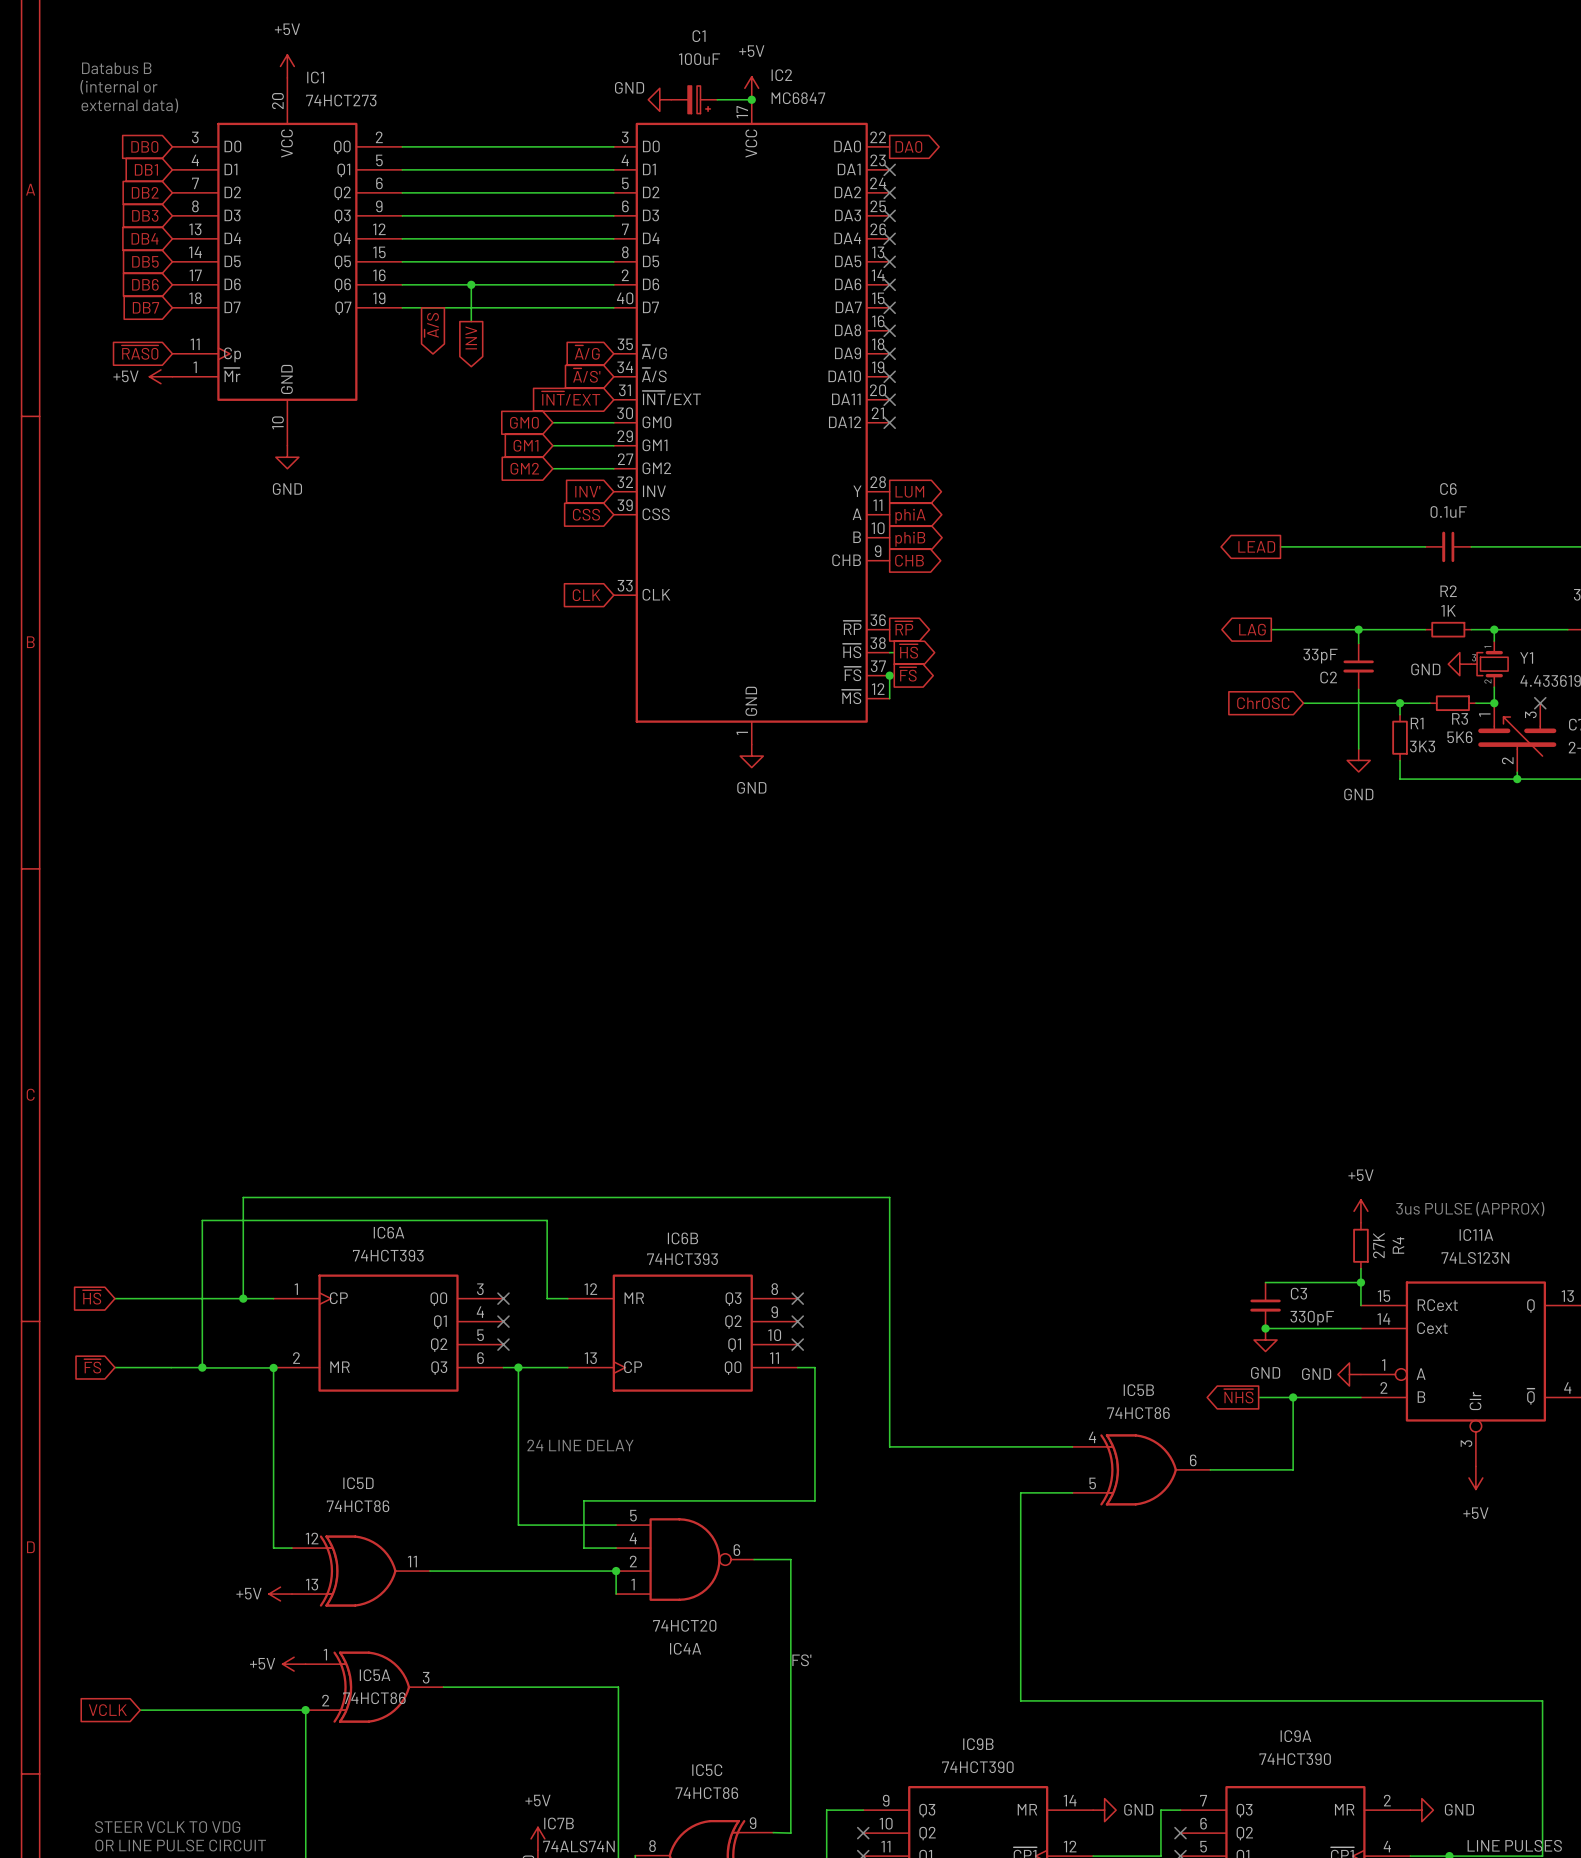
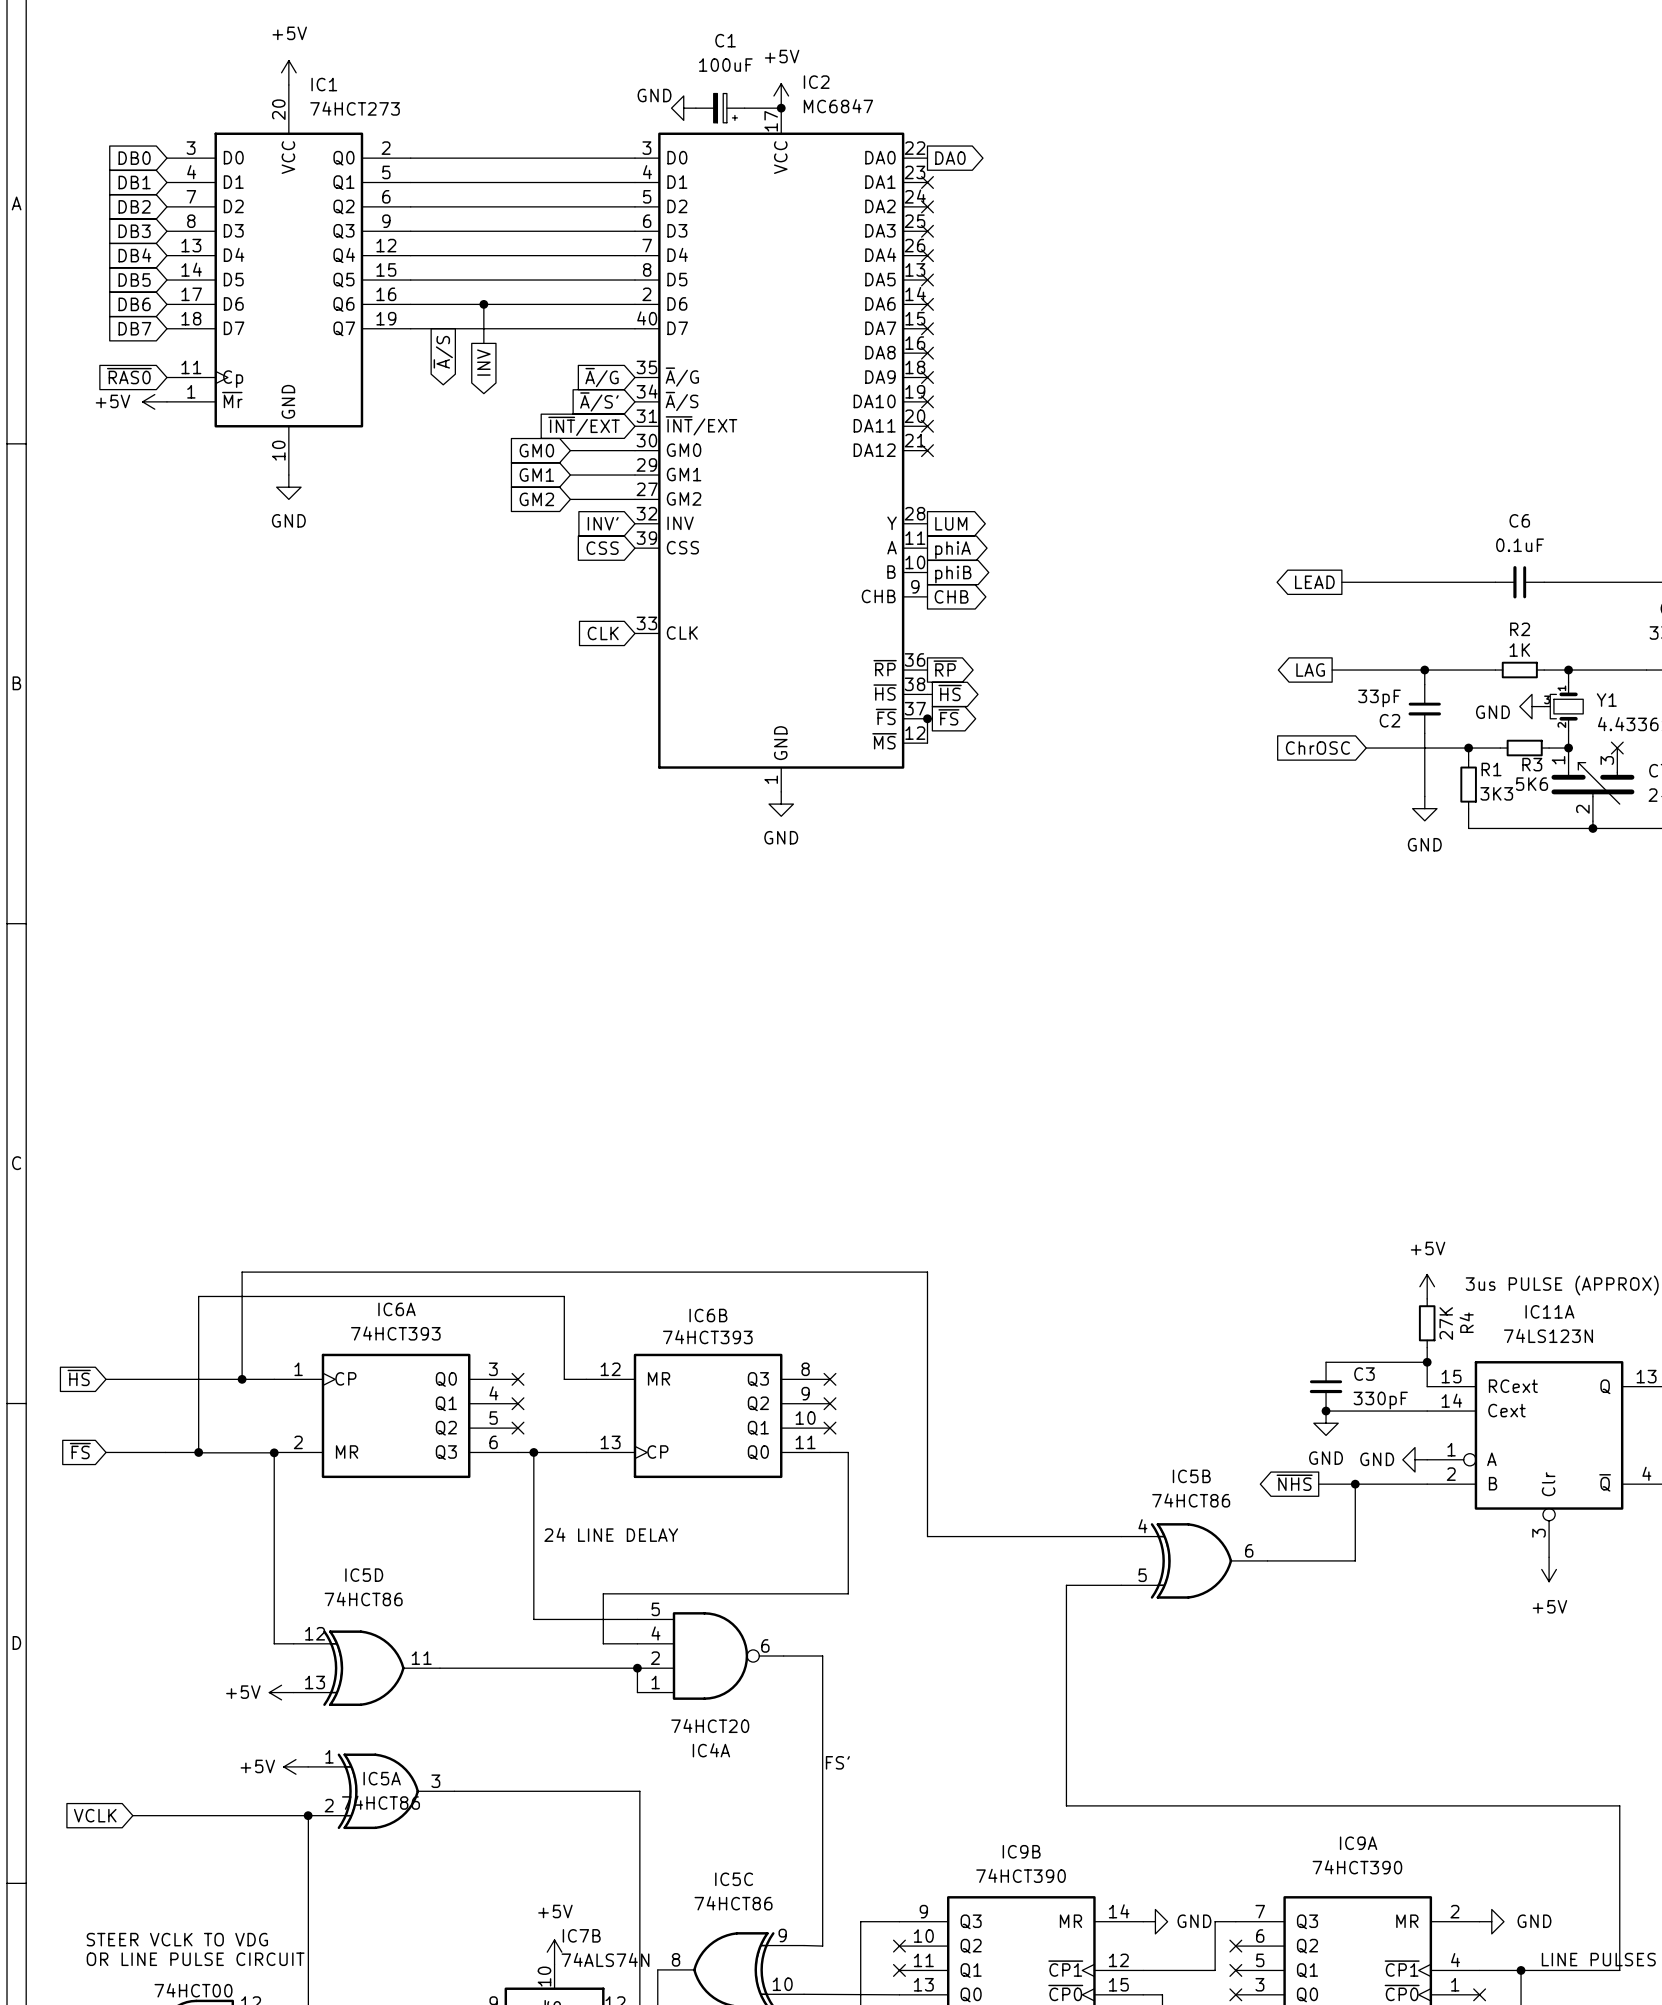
text: Databus B (116, 68) -> none
text: (internal or (118, 87) -> none
text: external data) (129, 105) -> none

